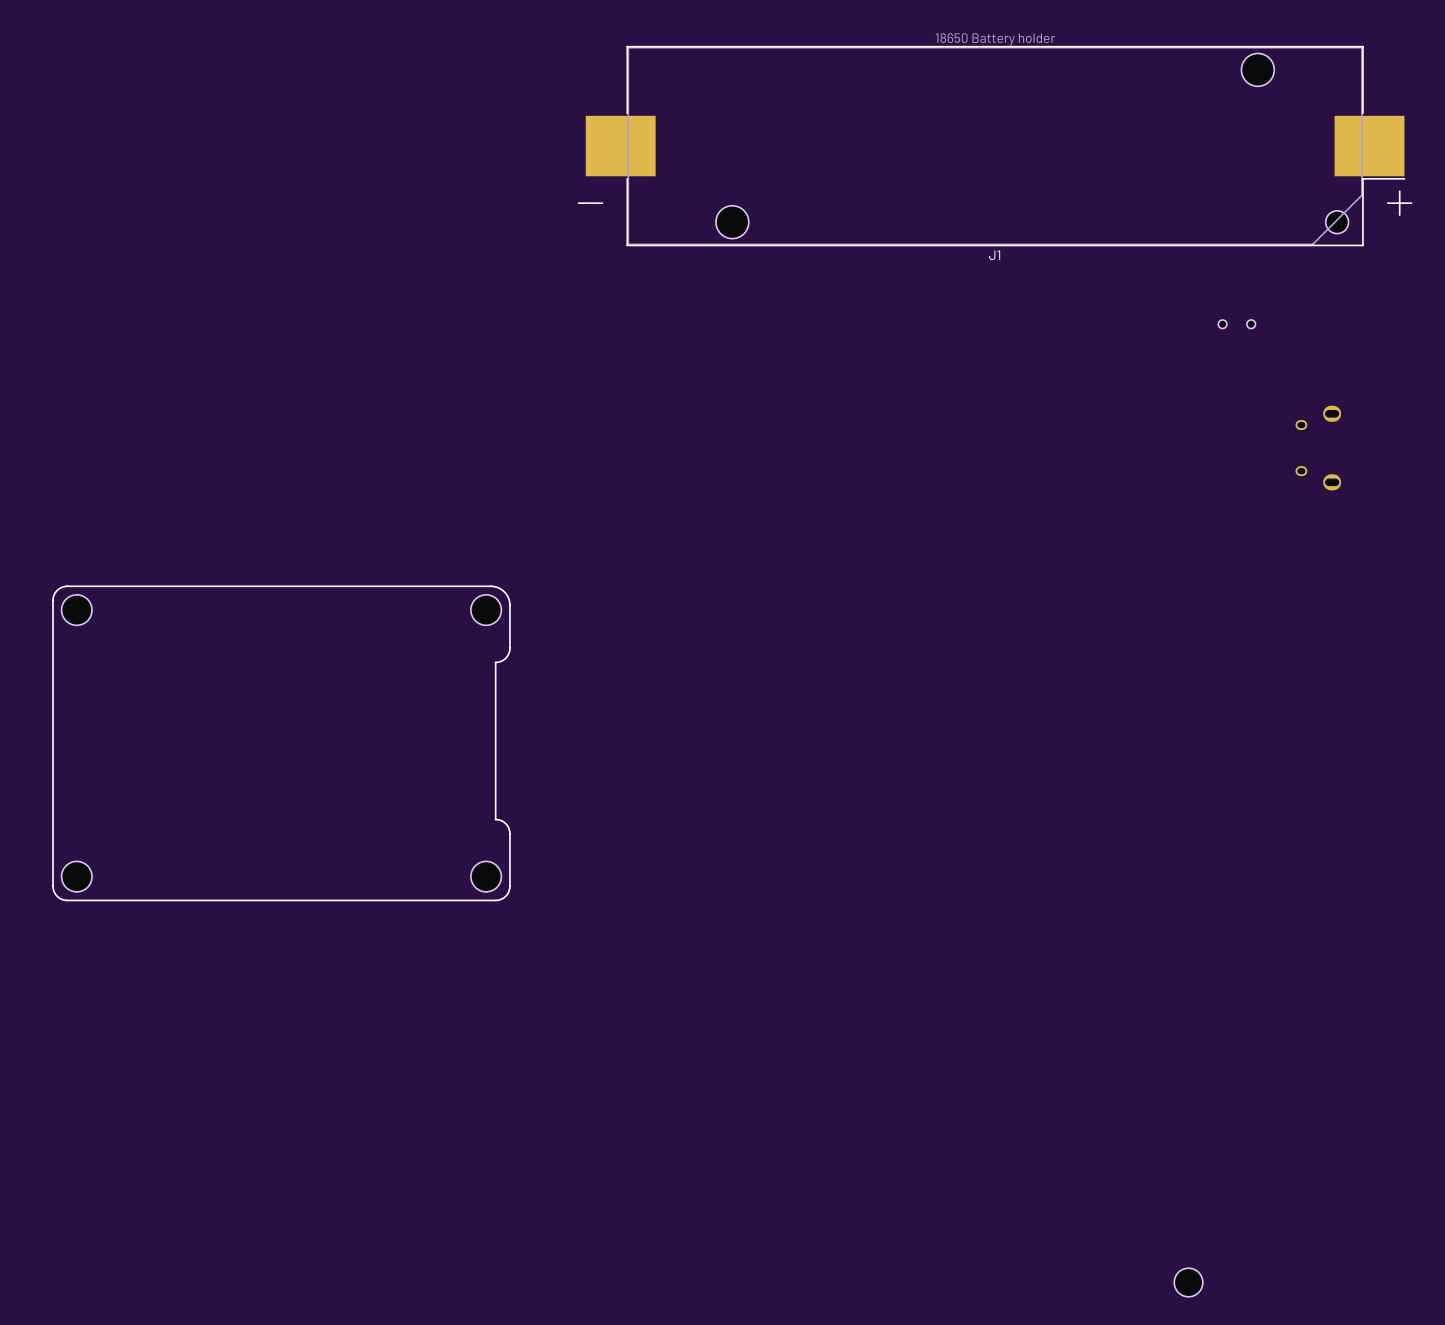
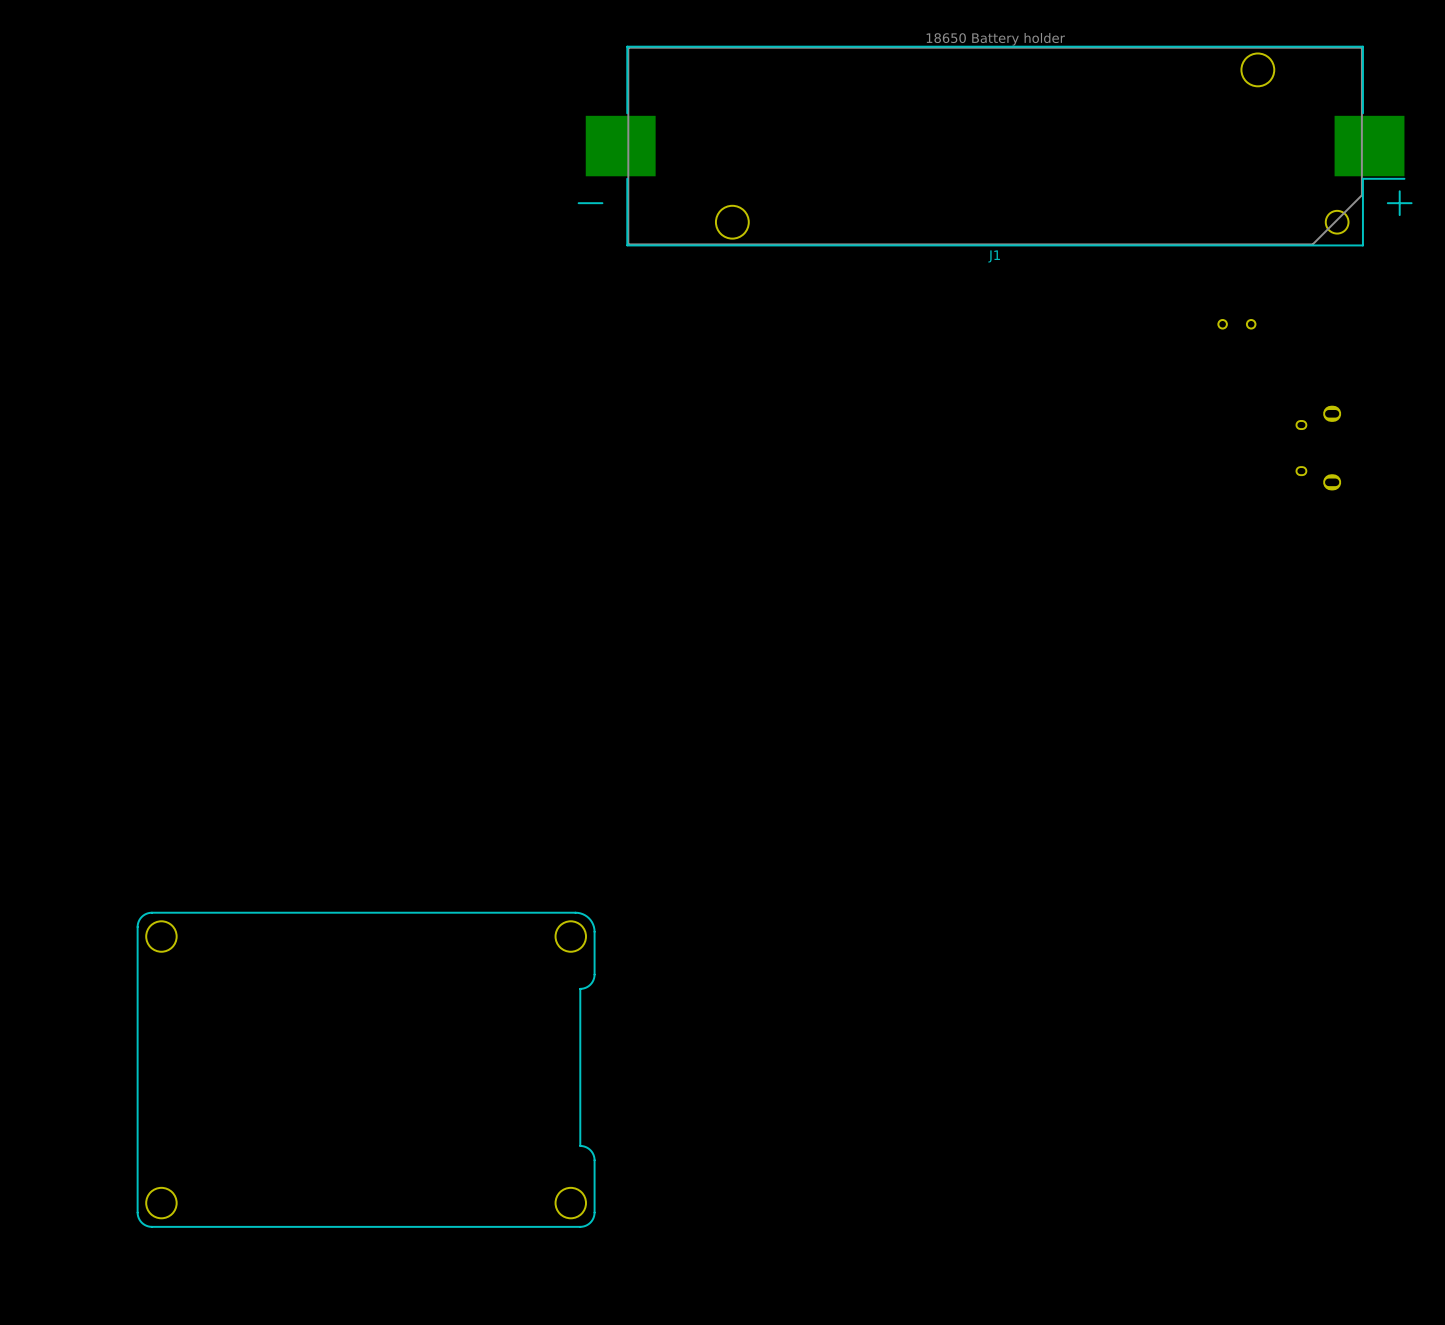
part: (281, 743) -> none
part: none -> (366, 1069)
part: (1188, 1282) -> none

